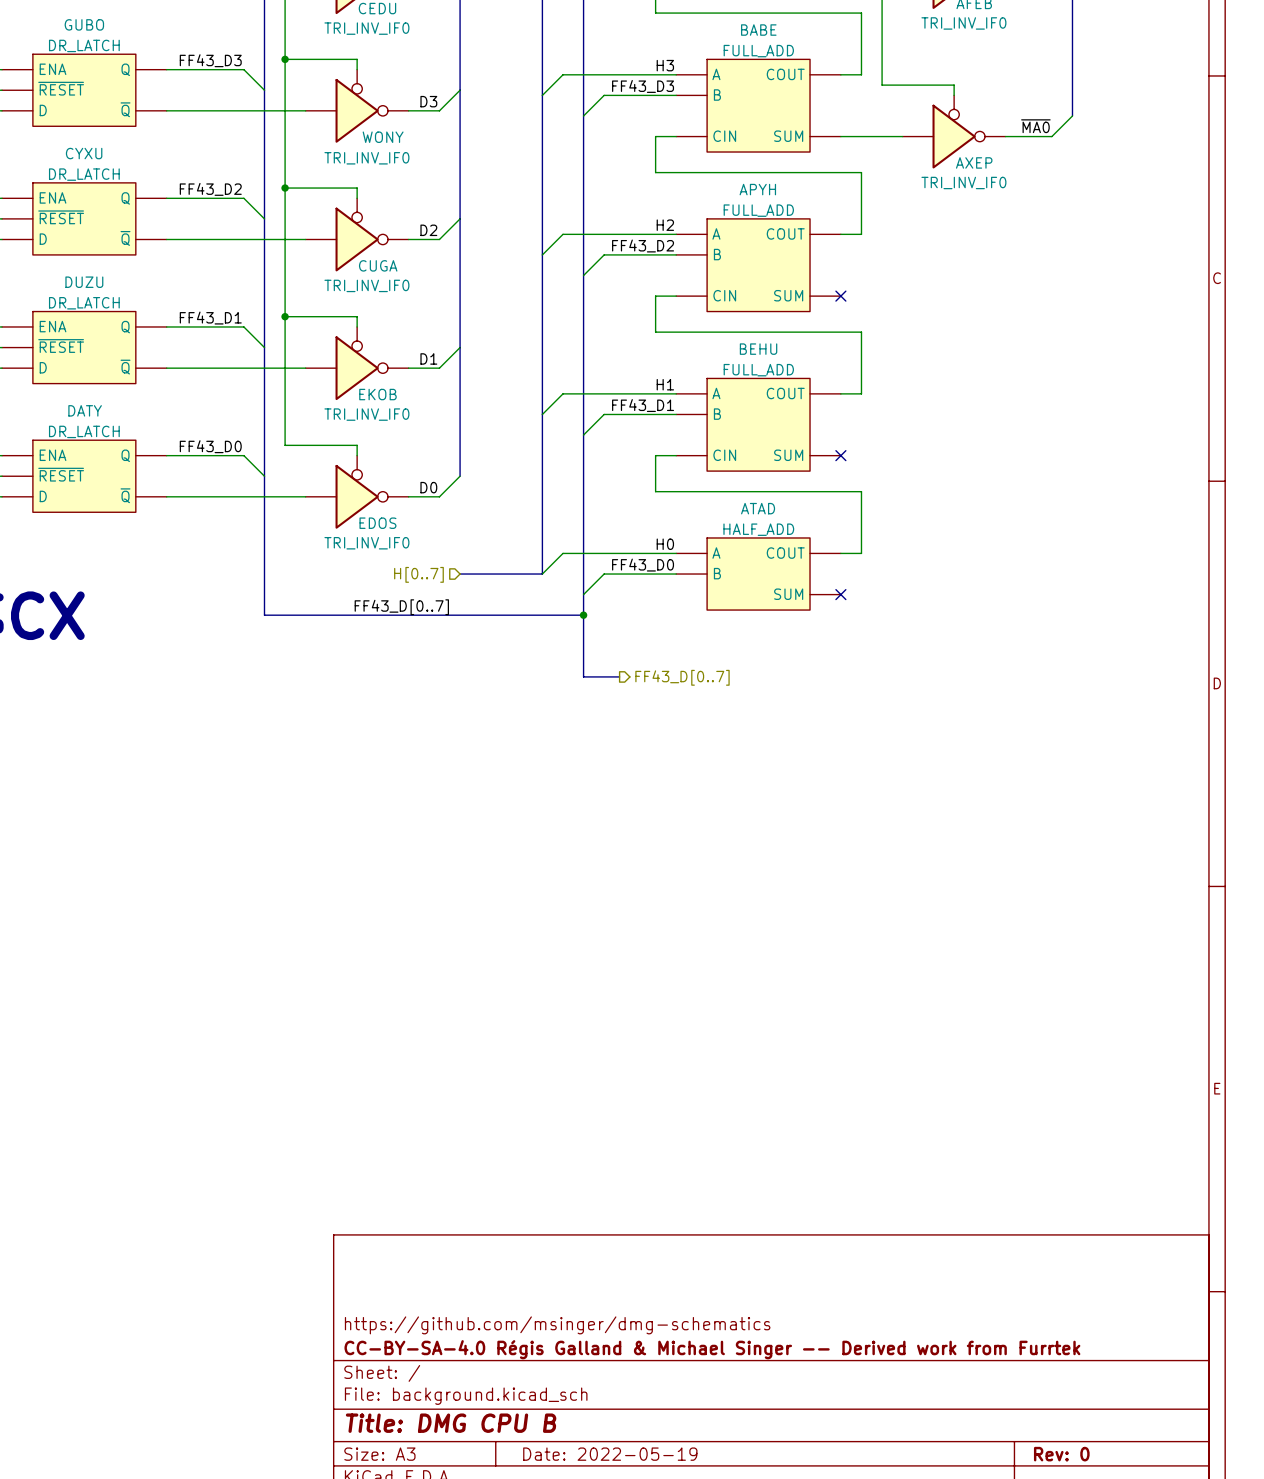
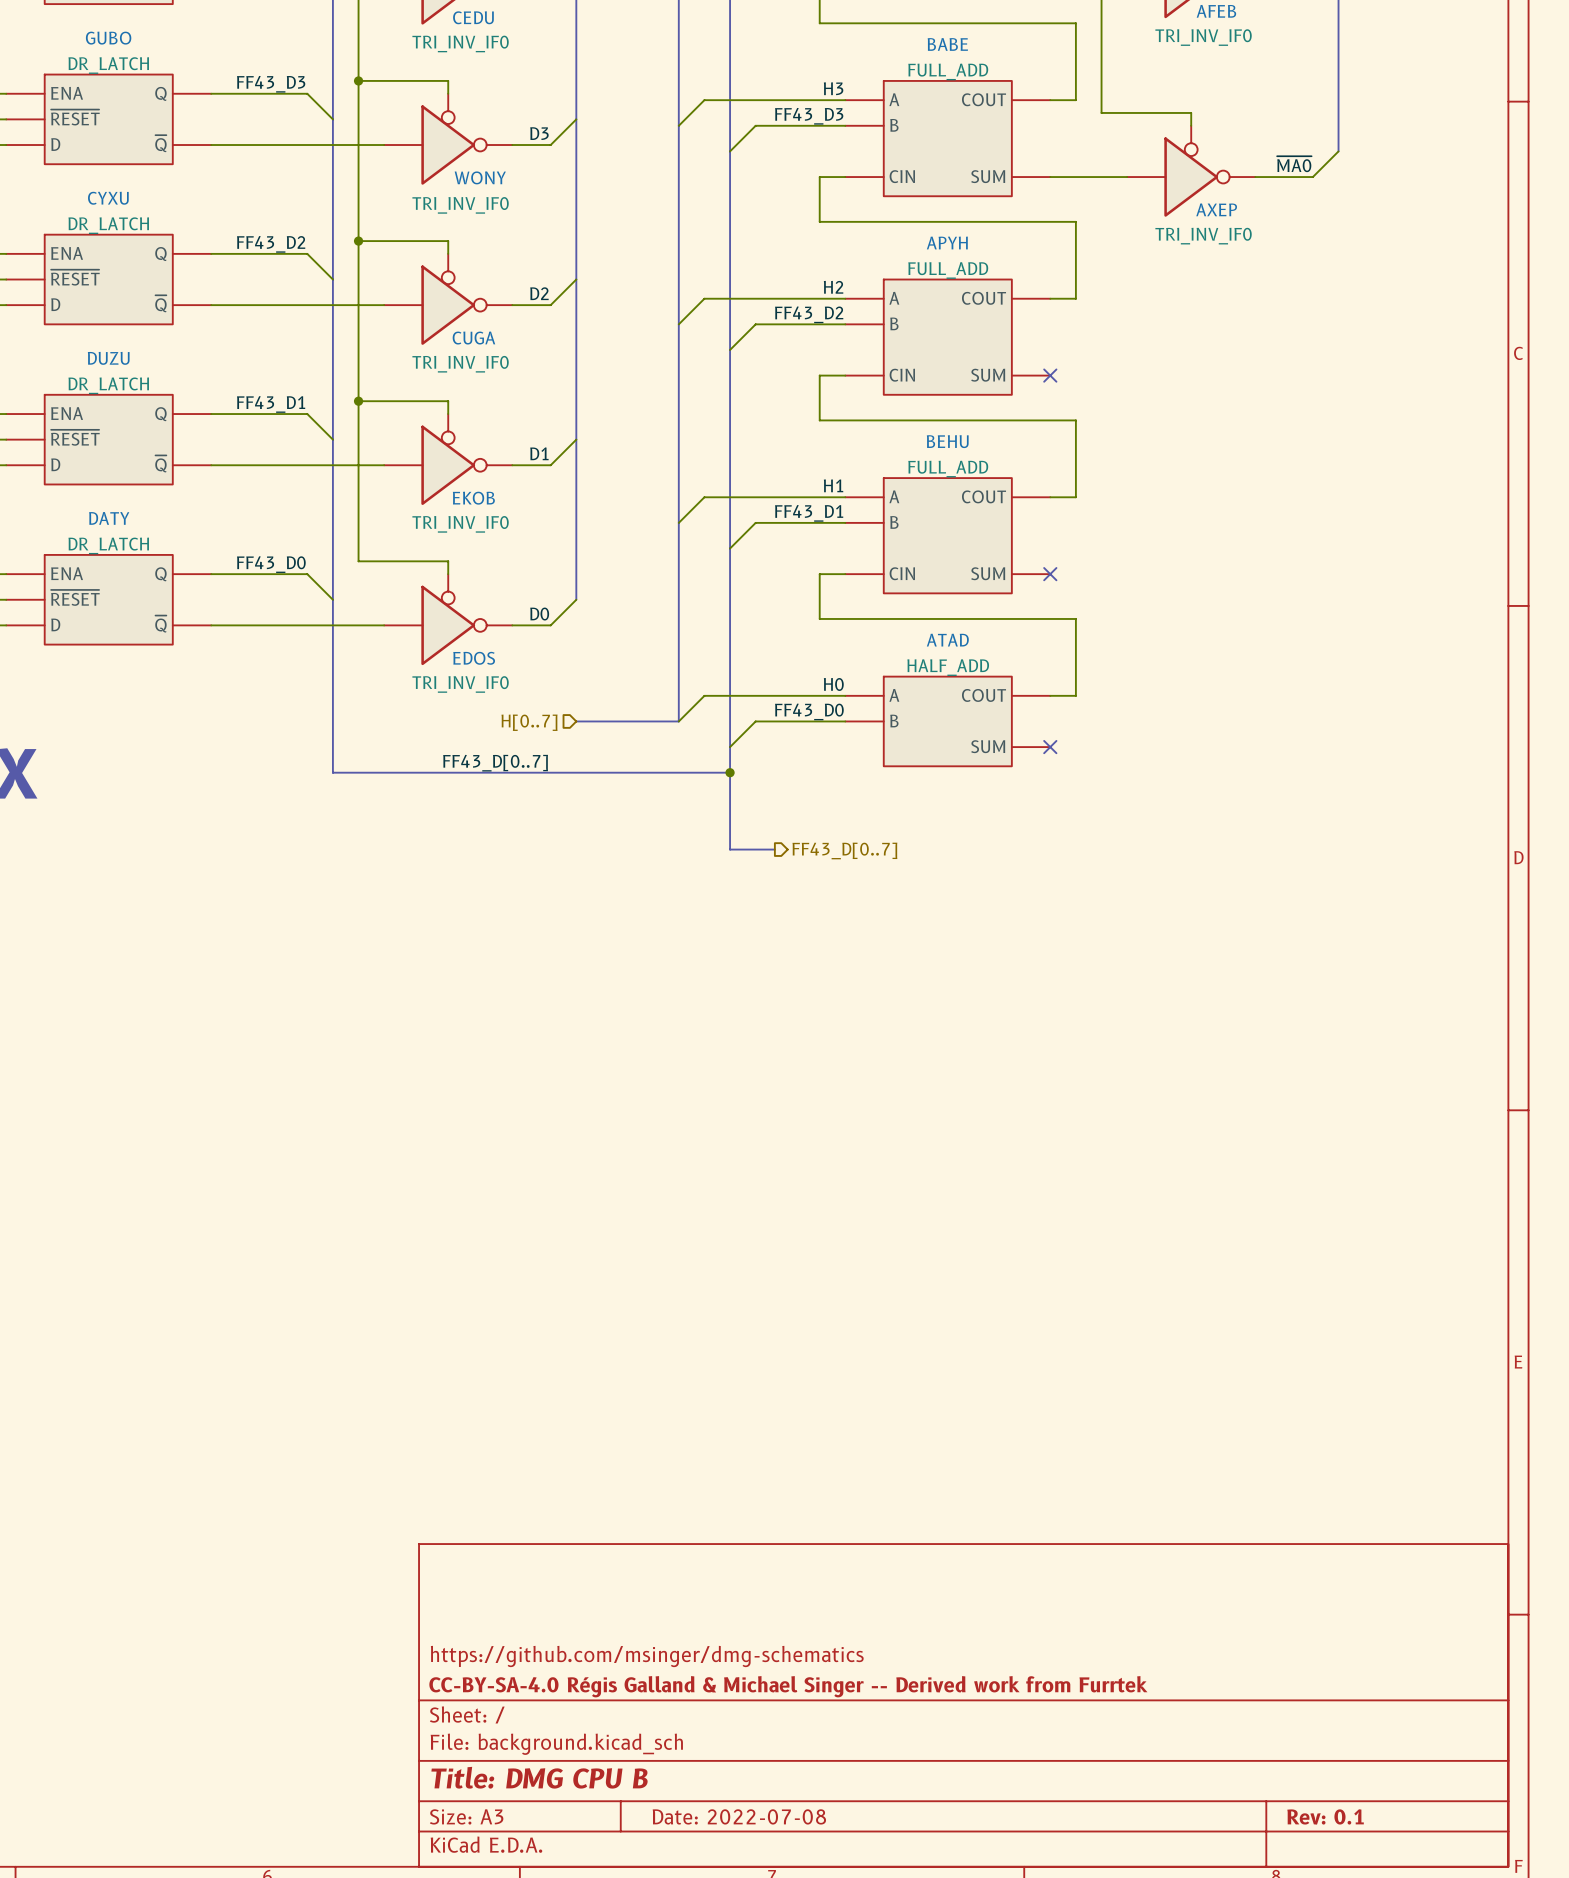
title block: Date: 2022-05-19 (610, 1454) -> Date: 2022-07-08 (739, 1816)
title block: Rev: 0 (1061, 1454) -> Rev: 0.1 (1325, 1816)

